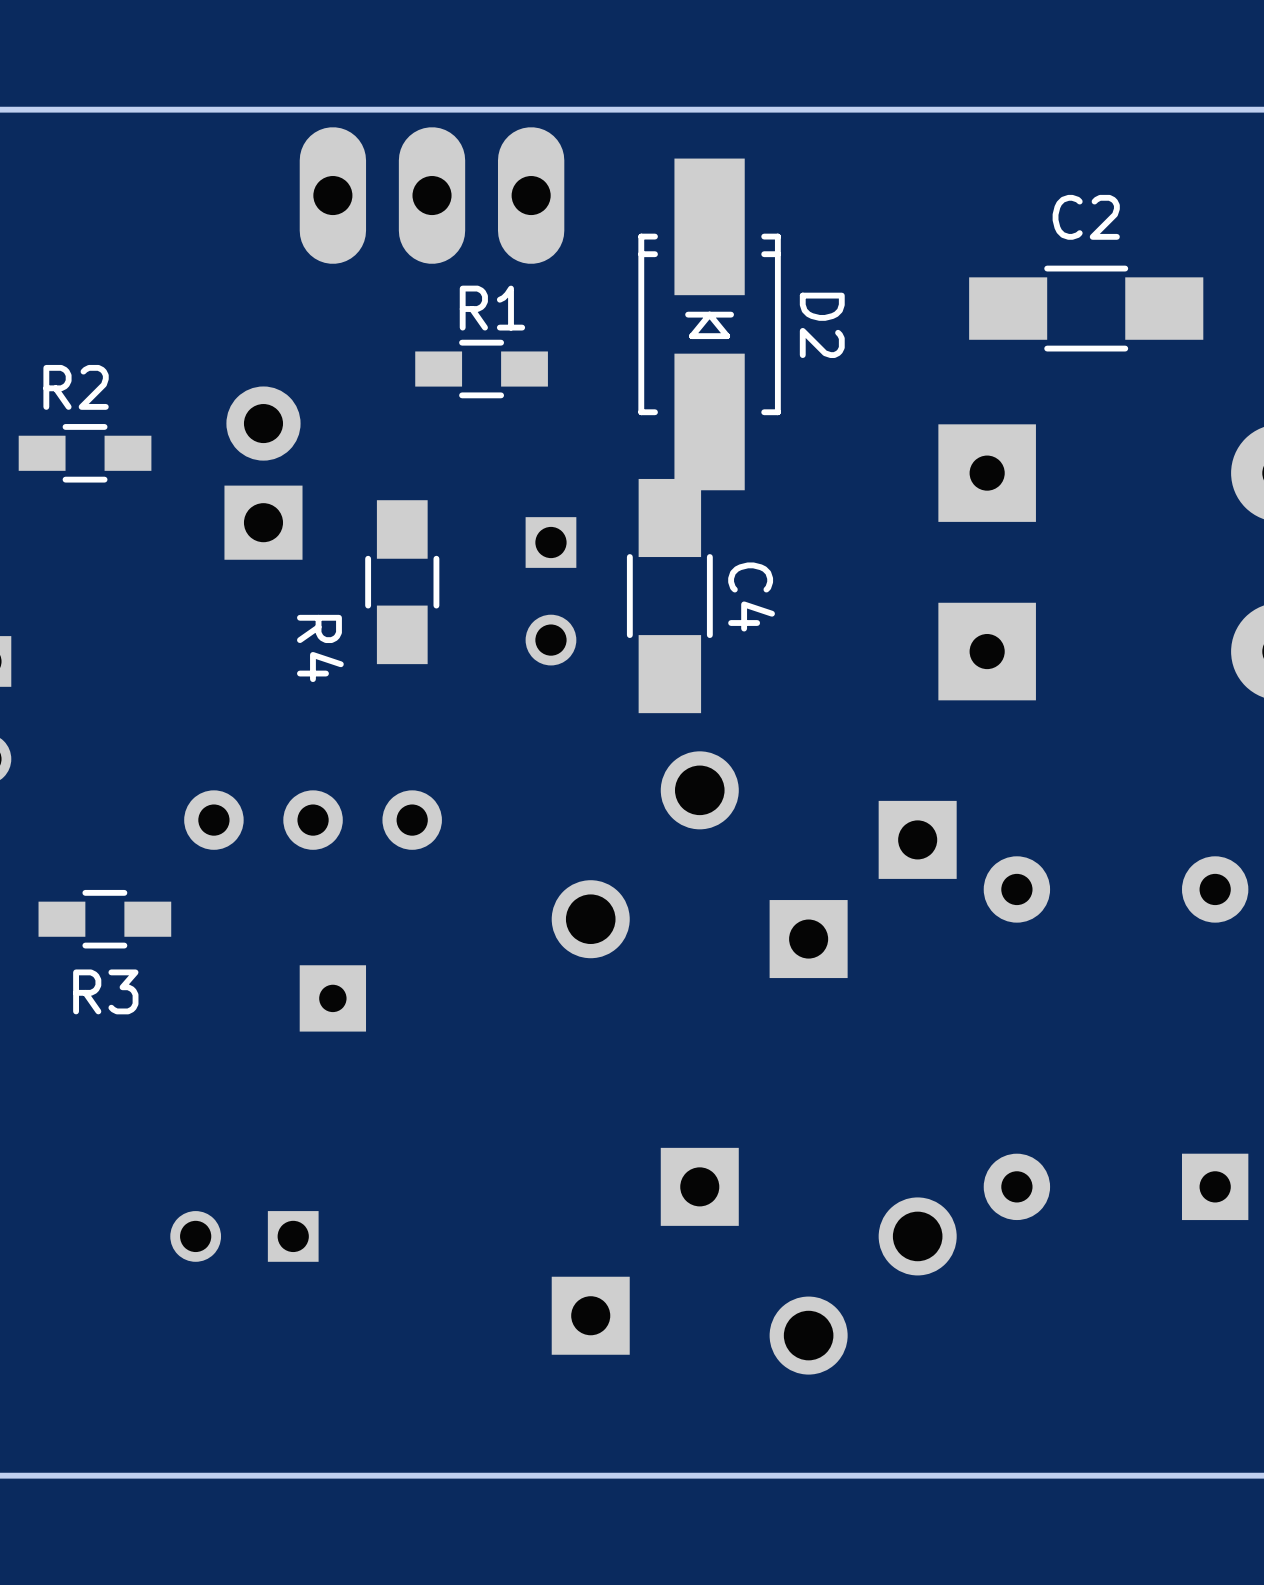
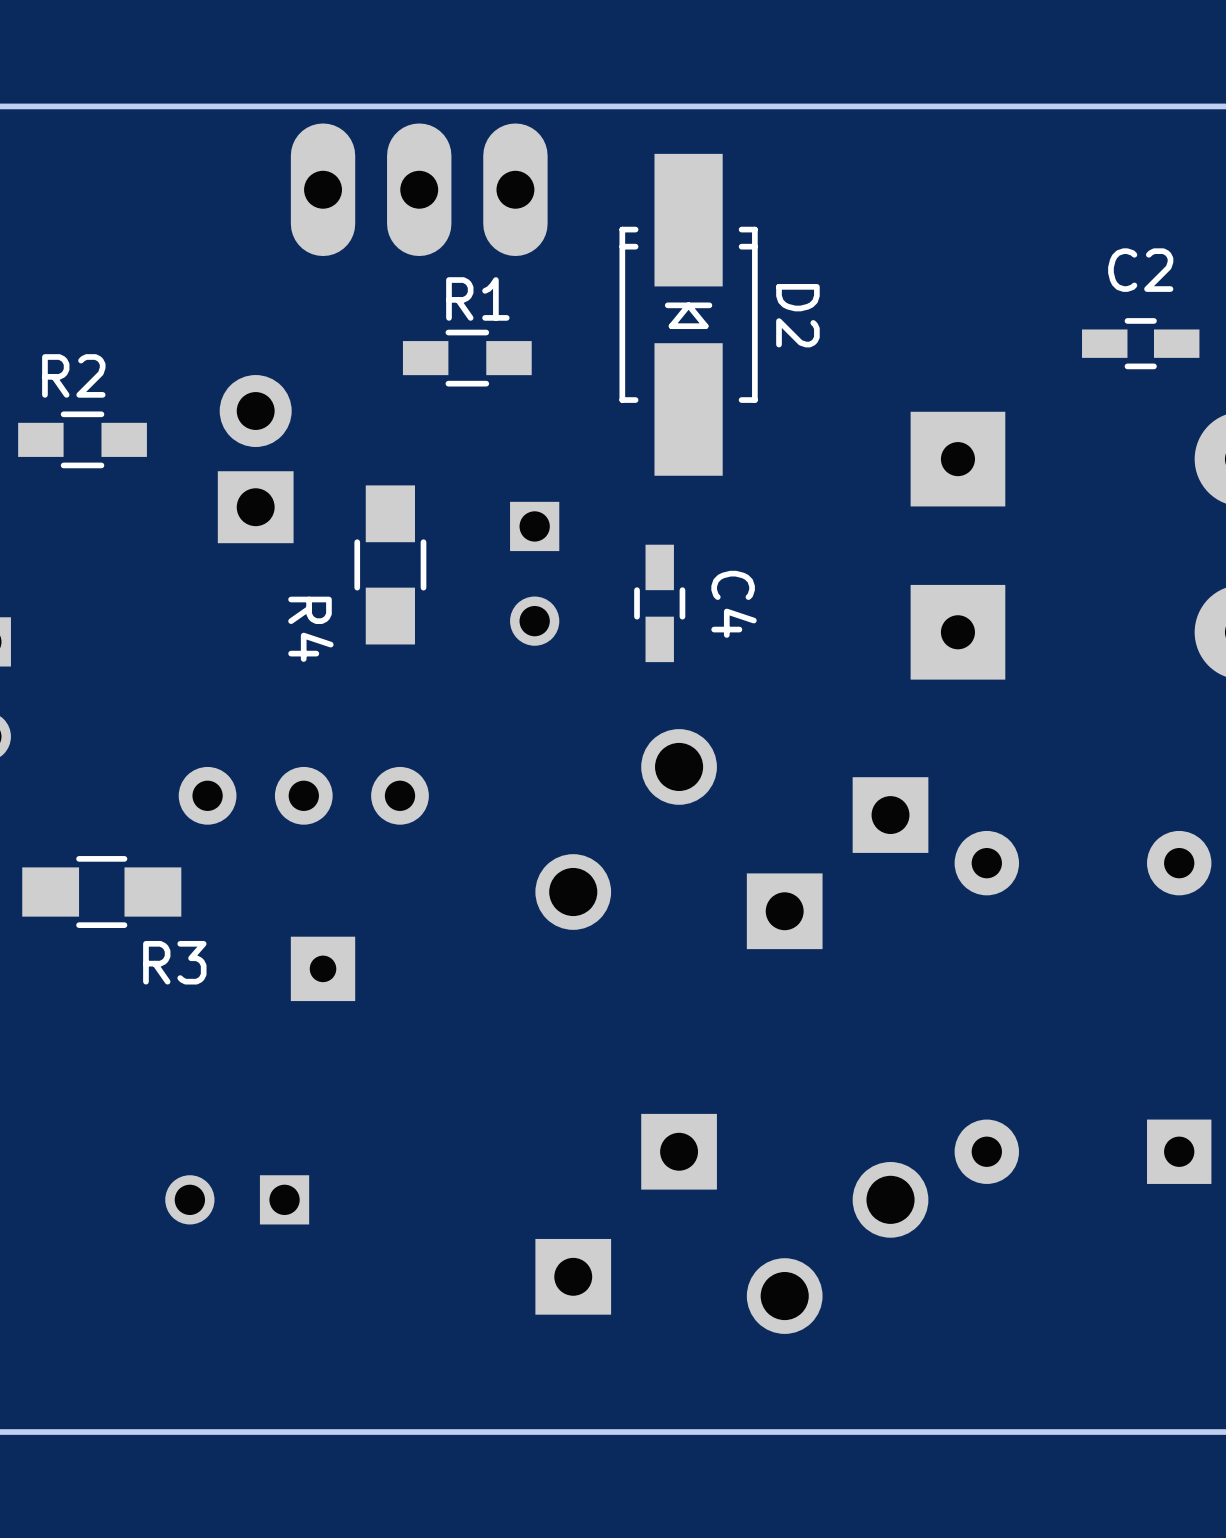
C2 footprint: [969, 265, 1204, 352] -> [1082, 318, 1200, 370]
C4 footprint: [626, 478, 713, 714] -> [634, 544, 686, 663]
R3 footprint: [38, 889, 172, 949] -> [22, 856, 182, 928]
R3 name position: R3 (105, 991) -> R3 (174, 962)

